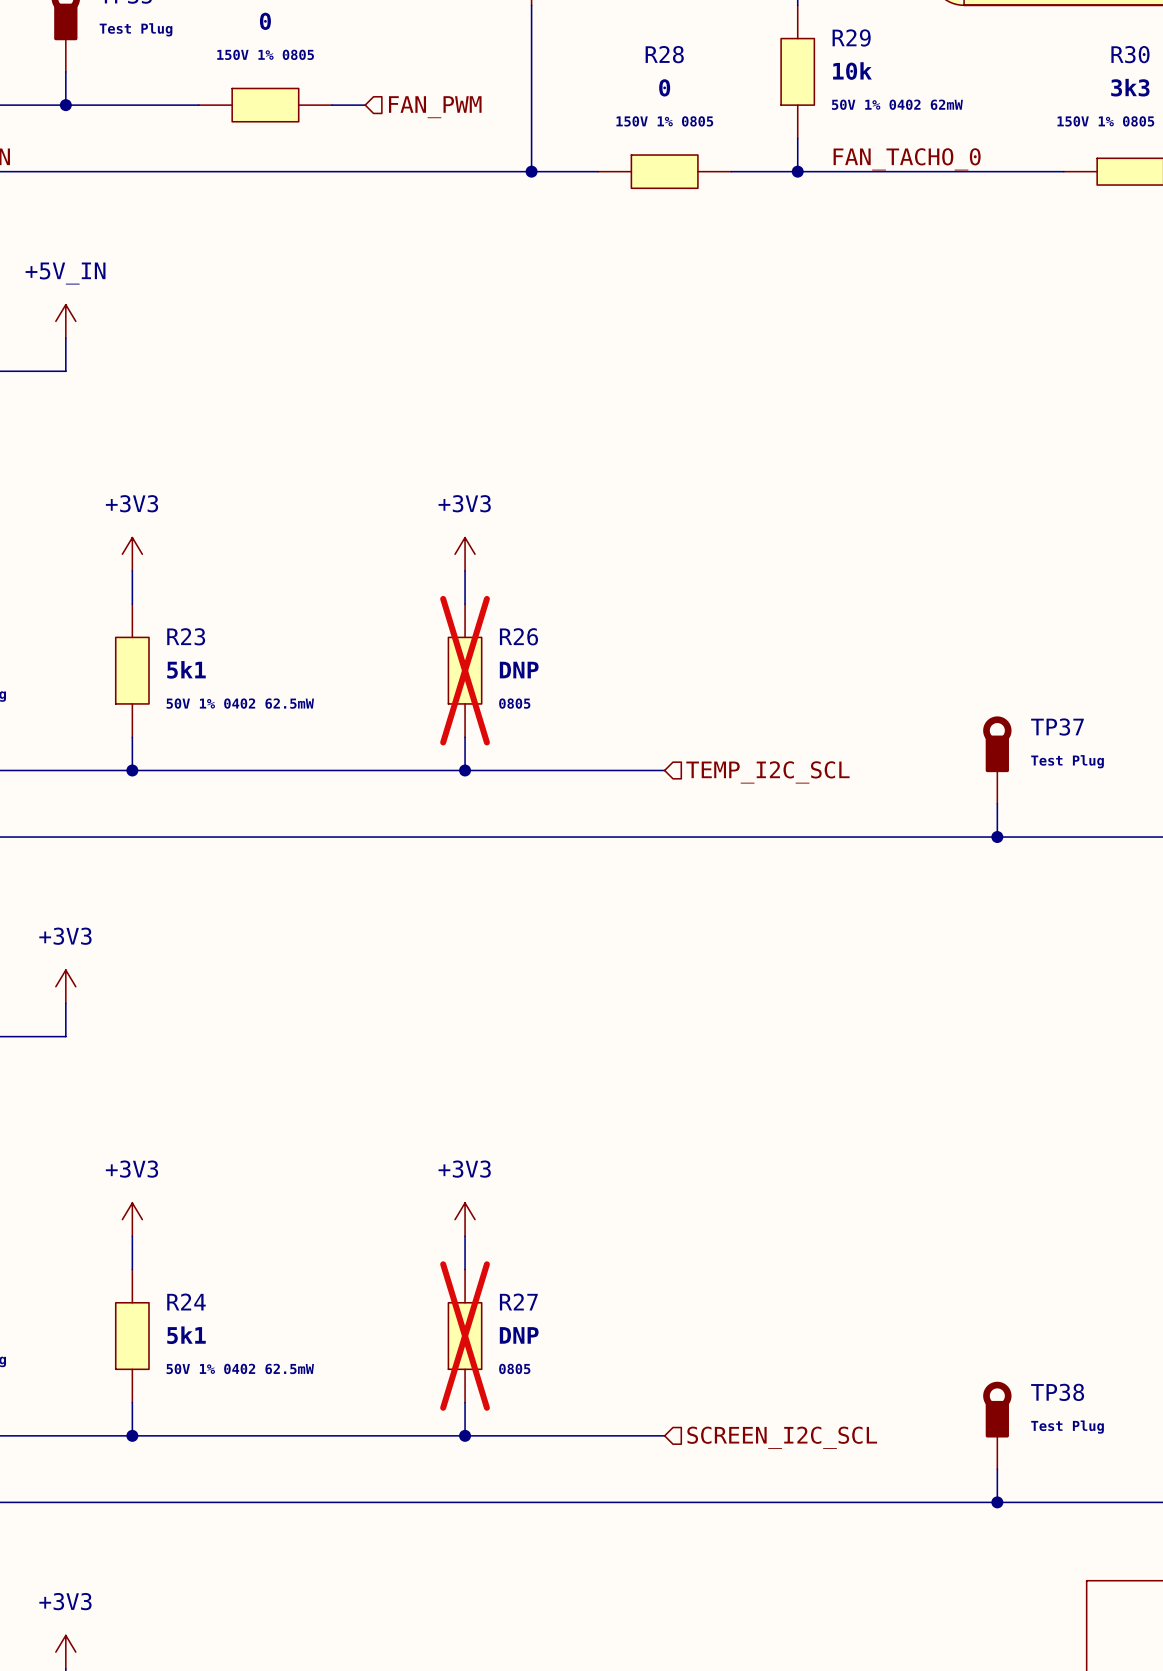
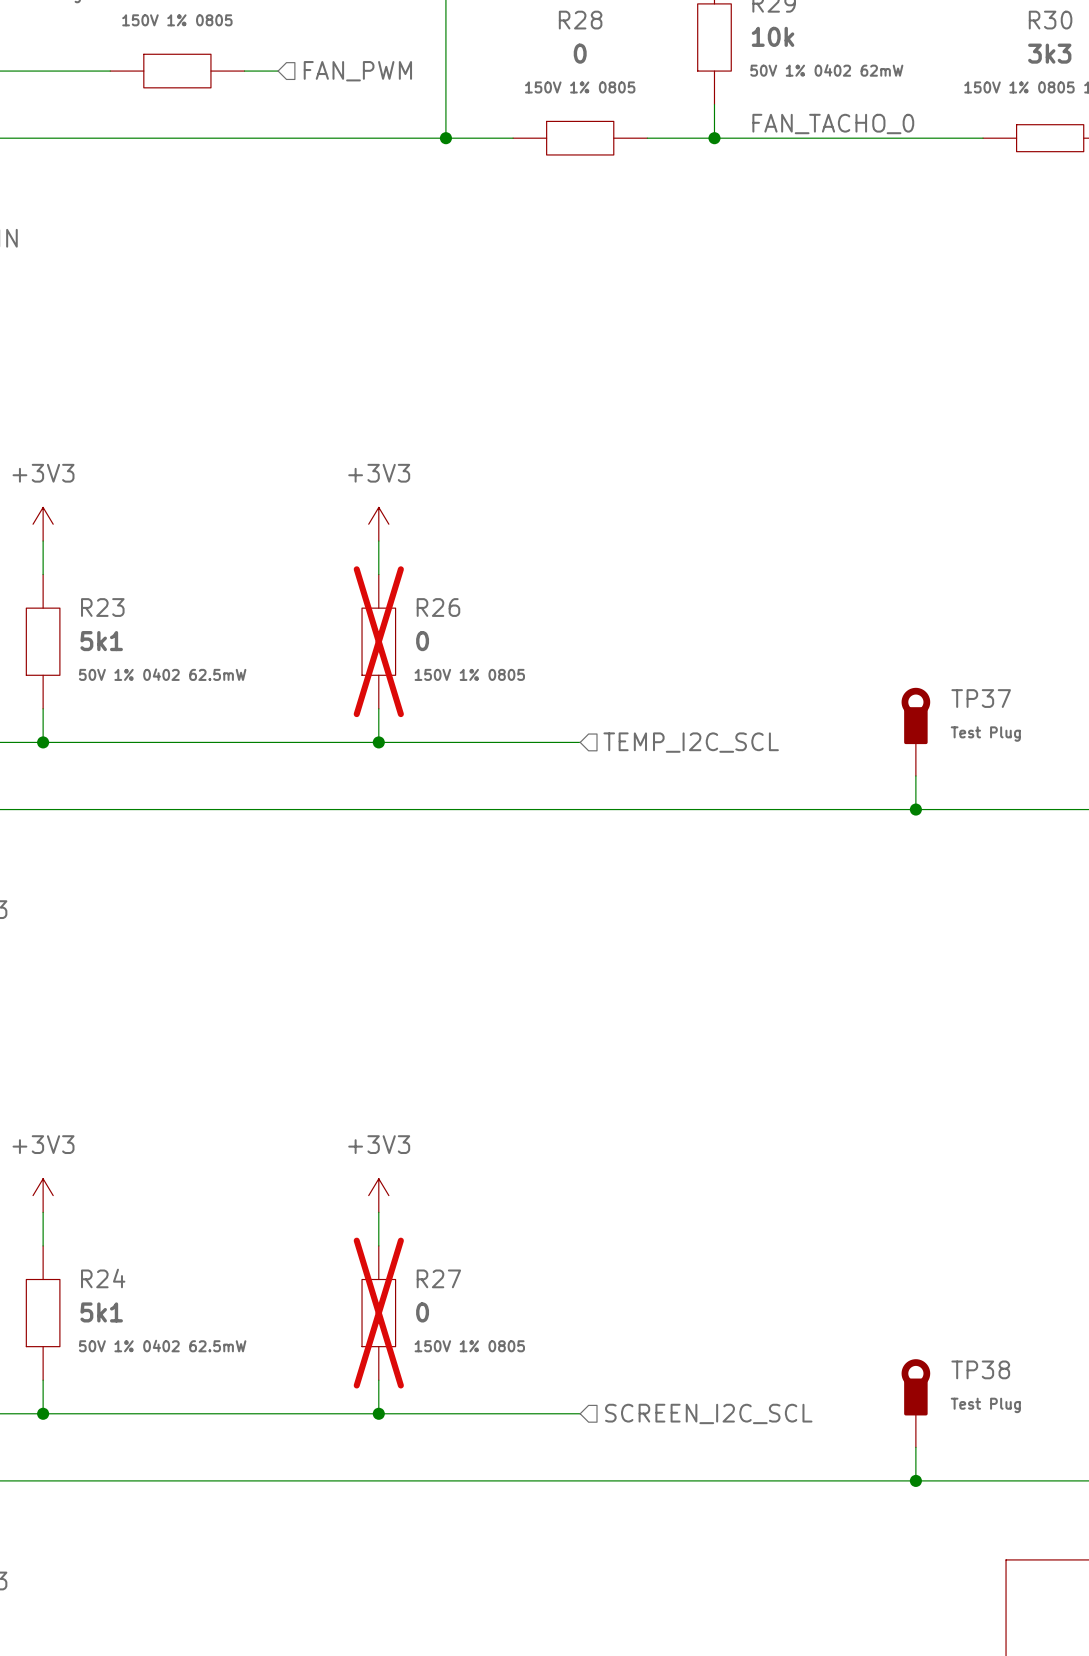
R26 value: DNP (519, 670) -> 0 (422, 641)
R26 text: 0805 (514, 703) -> 150V 1% 0805 (469, 674)
R27 value: DNP (519, 1335) -> 0 (422, 1312)
R27 text: 0805 (514, 1368) -> 150V 1% 0805 (469, 1346)

